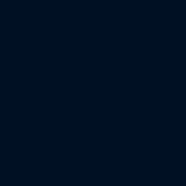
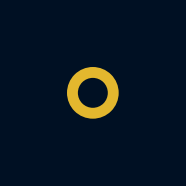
part: none -> (92, 92)

